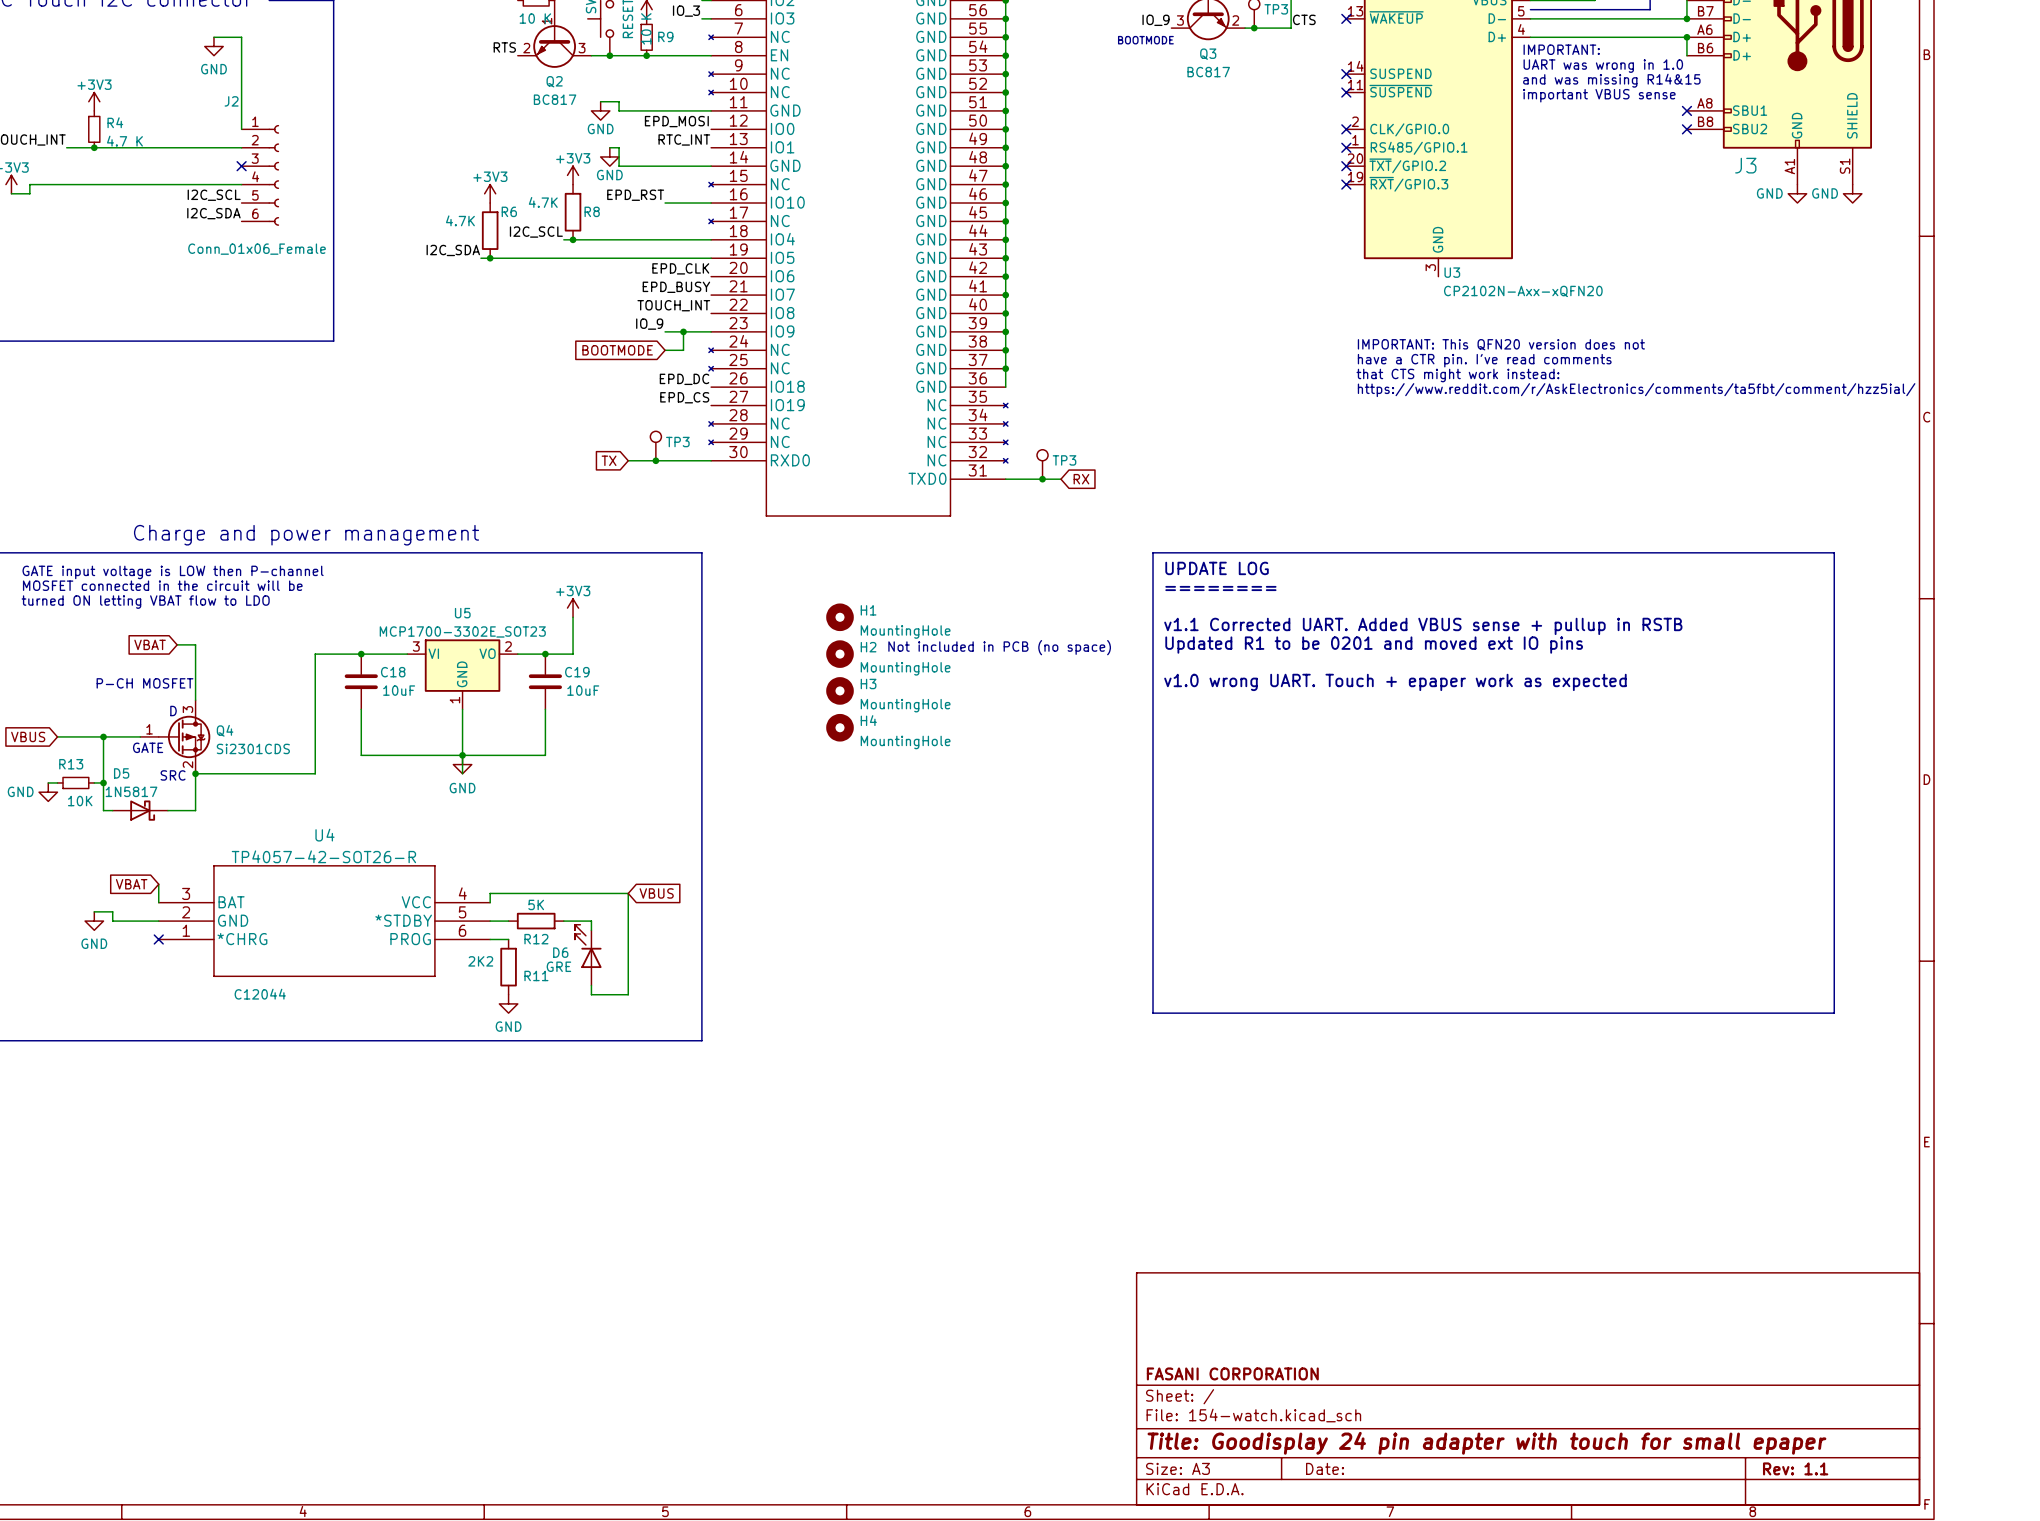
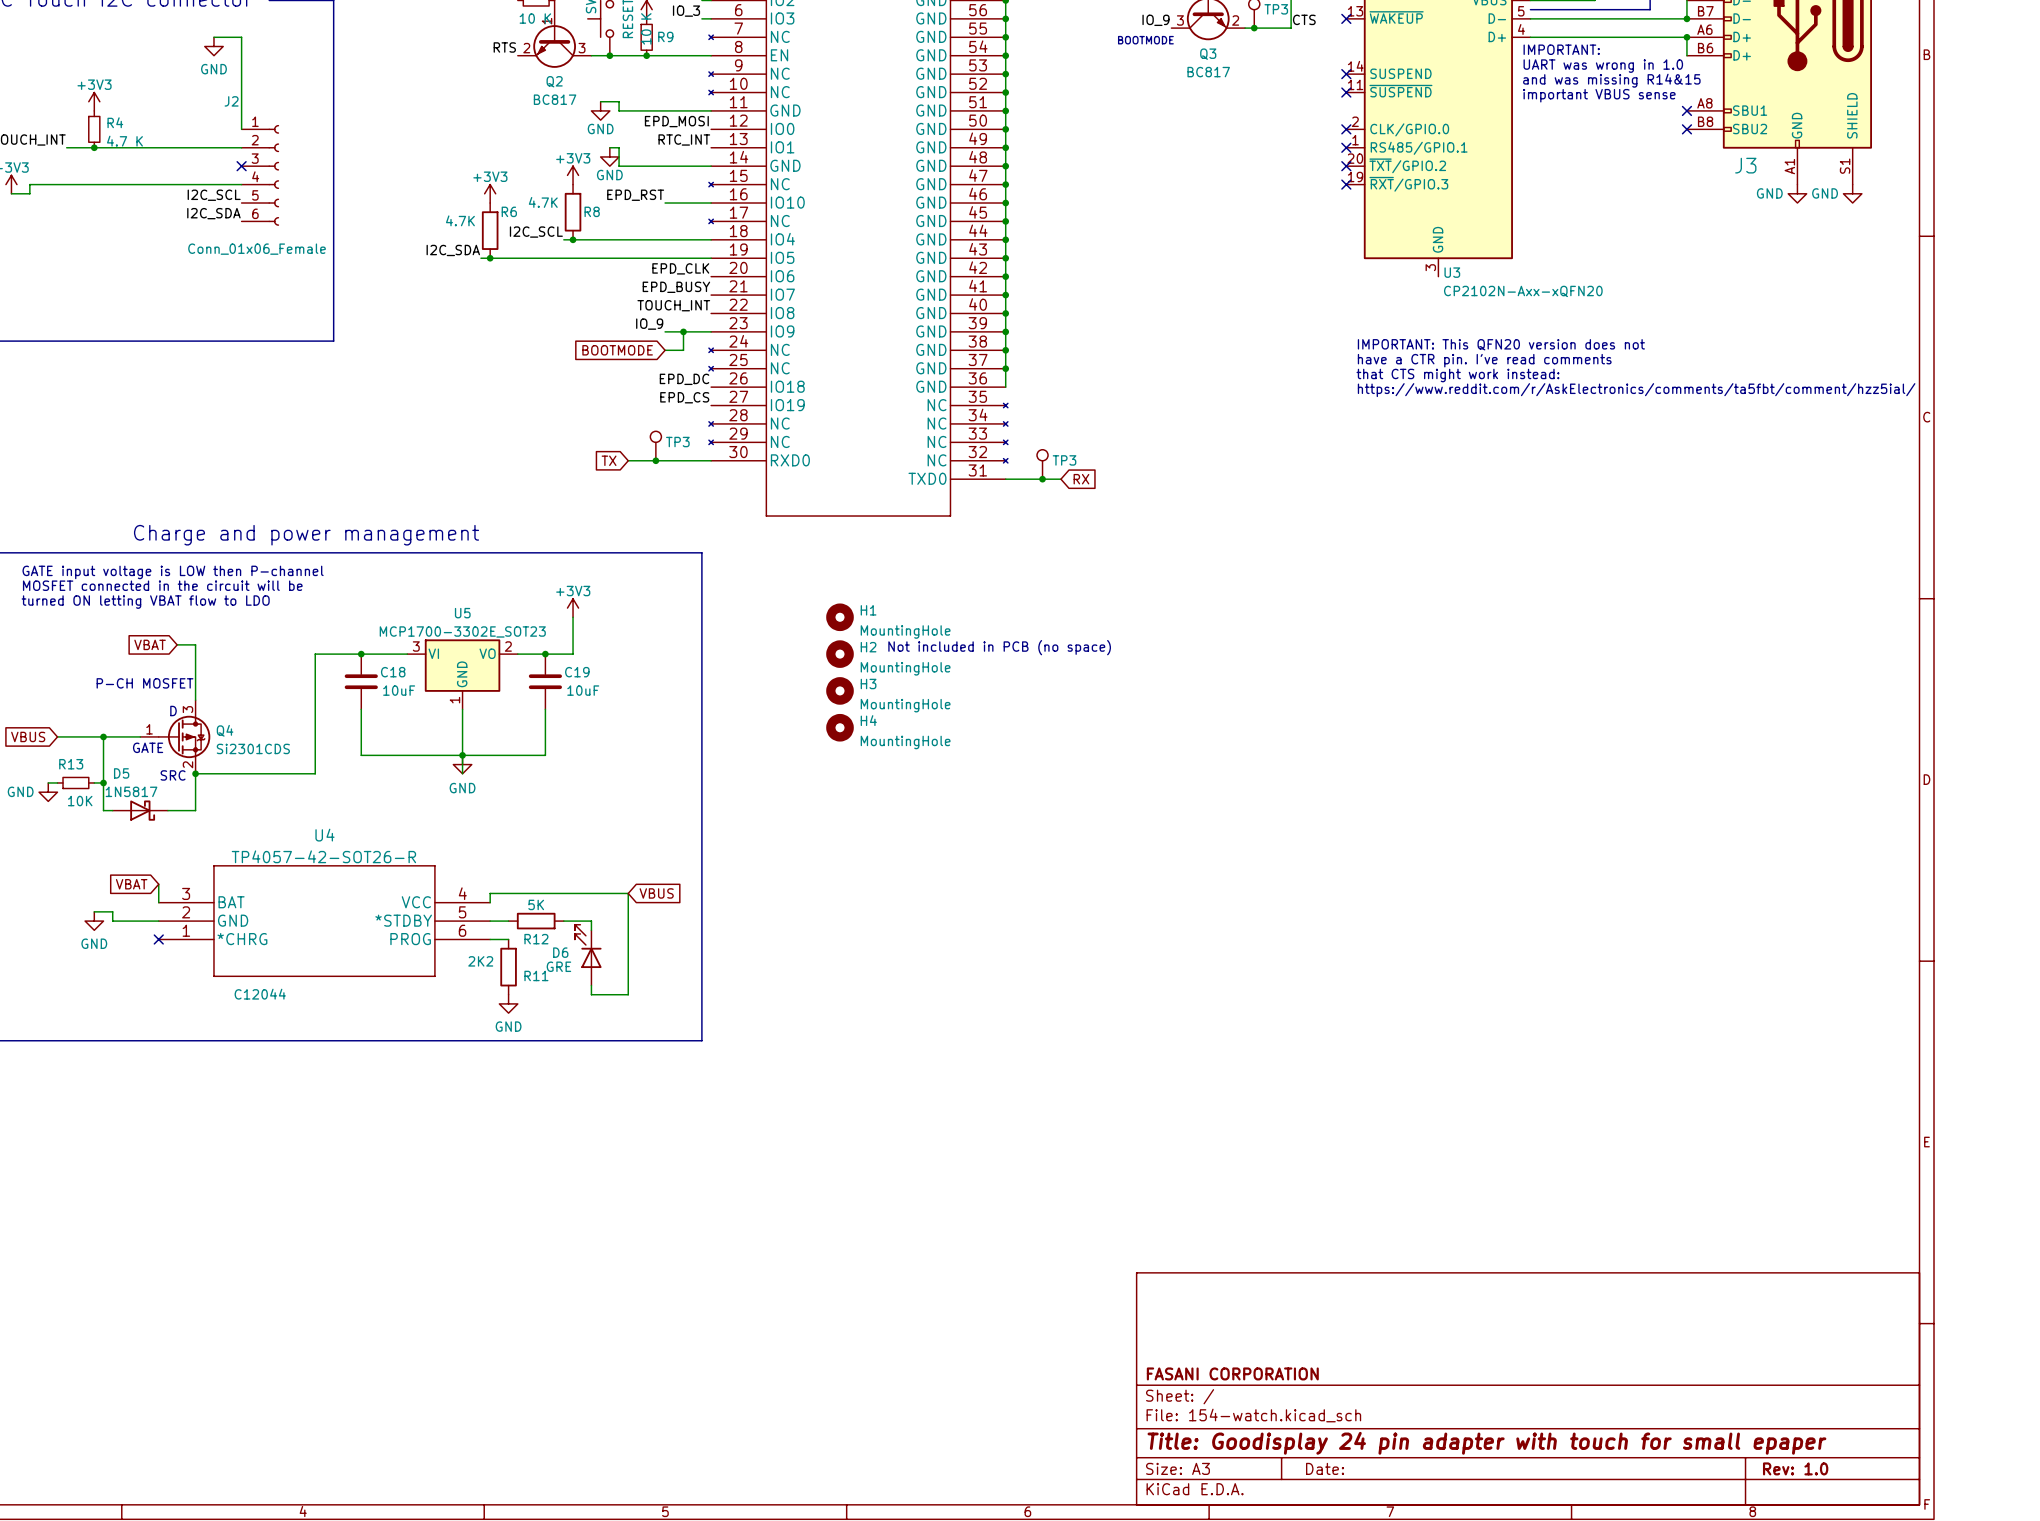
line: (1153, 552) (1834, 552) (1834, 1013) (1153, 1013) (1153, 552) -> none
text: UPDATE LOG (1217, 568) -> none
text: ======== (1220, 588) -> none
text: v1.1 Corrected UART. Added VBUS sense + pullup in RSTB (1423, 626) -> none
text: Updated R1 to be 0201 and moved ext IO pins (1374, 645) -> none
text: v1.0 wrong UART. Touch + epaper work as expected (1395, 682) -> none
title block: Rev: 1.1 (1795, 1468) -> Rev: 1.0 (1795, 1468)

